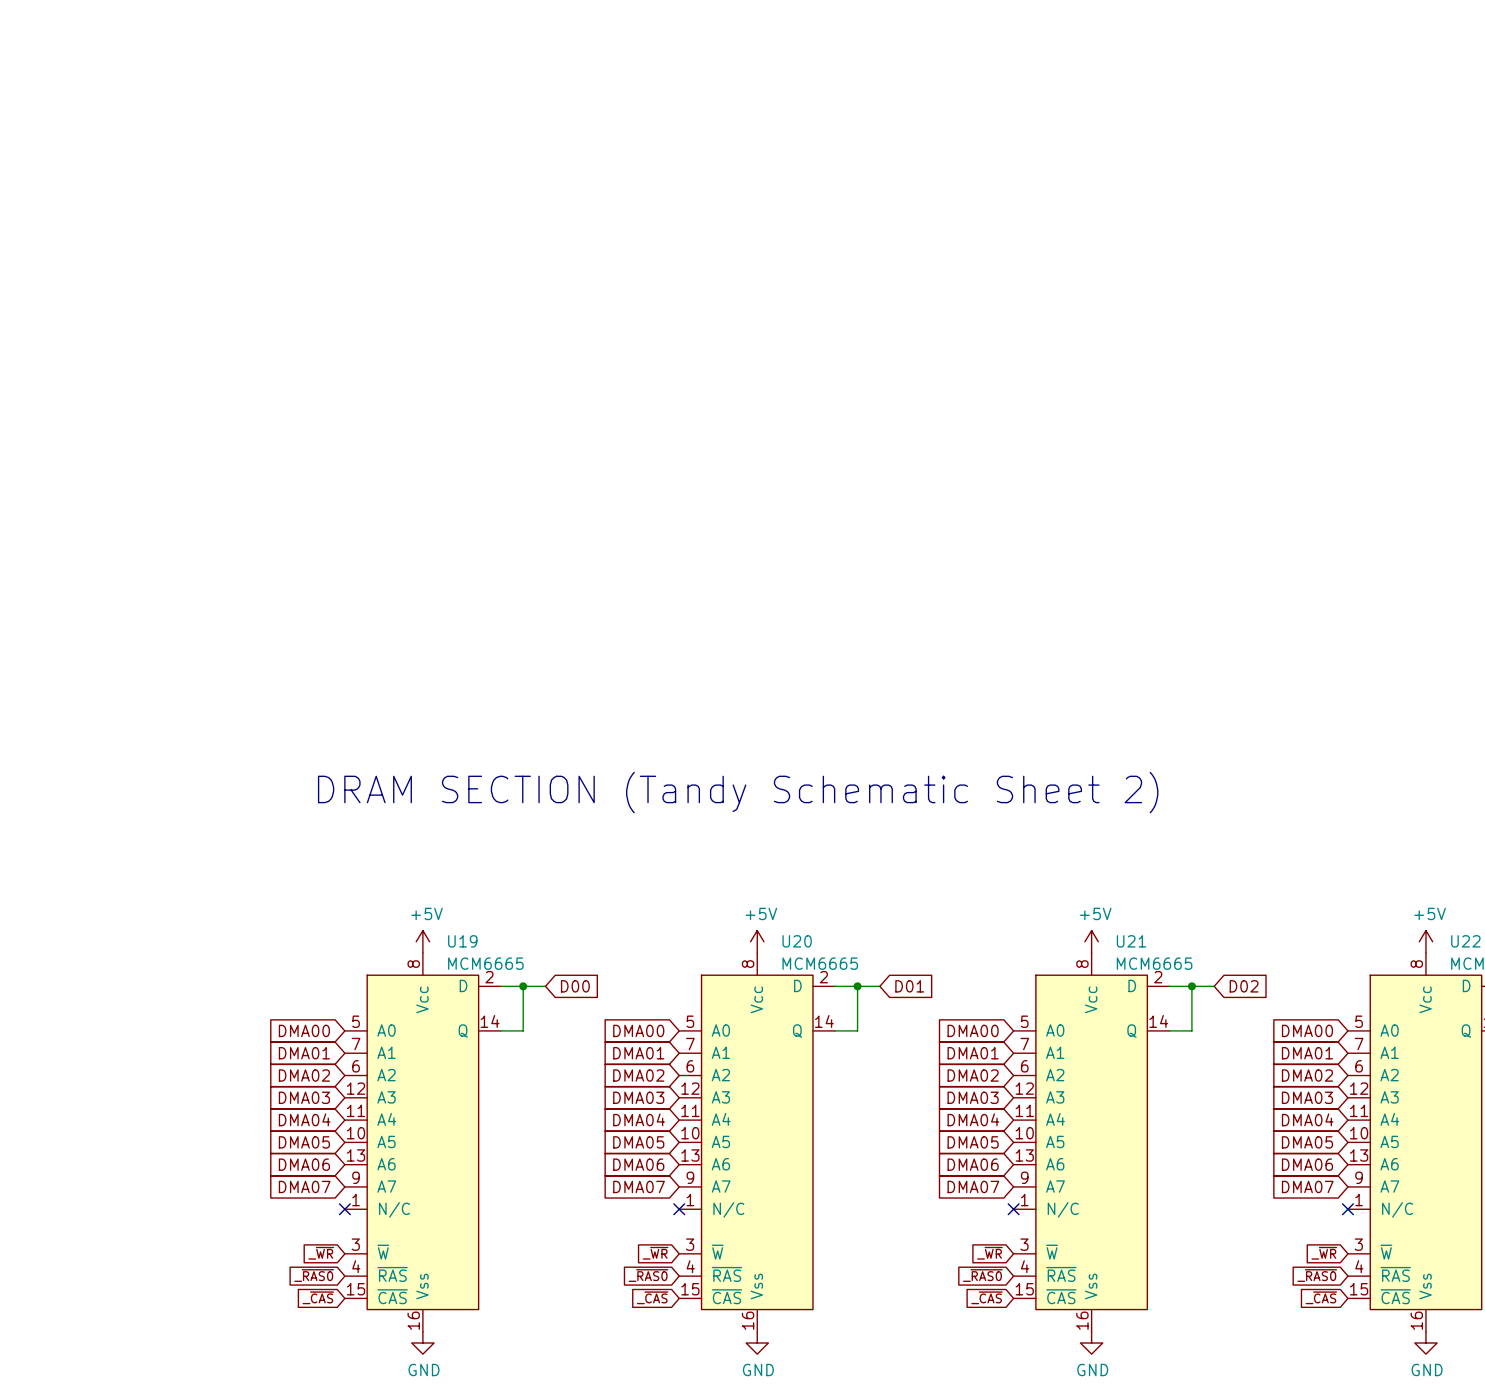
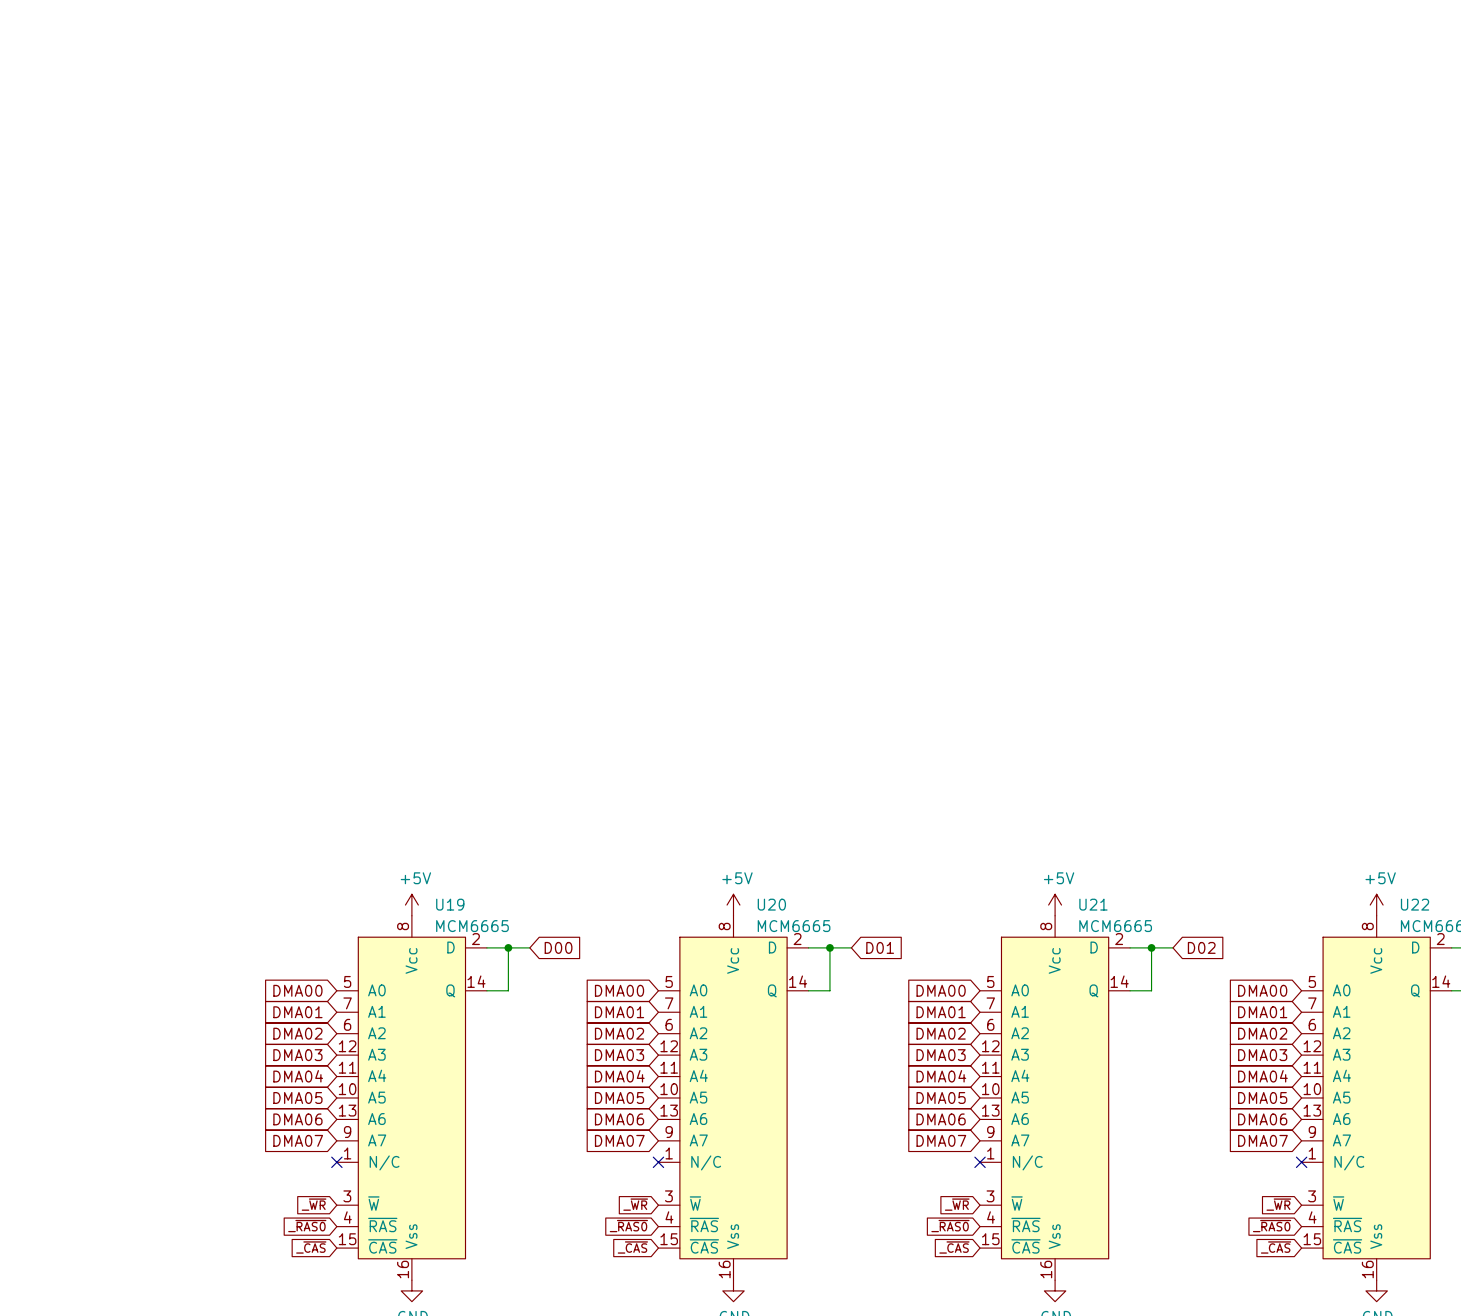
text: DRAM SECTION (Tandy Schematic Sheet 2) (738, 792) -> none

